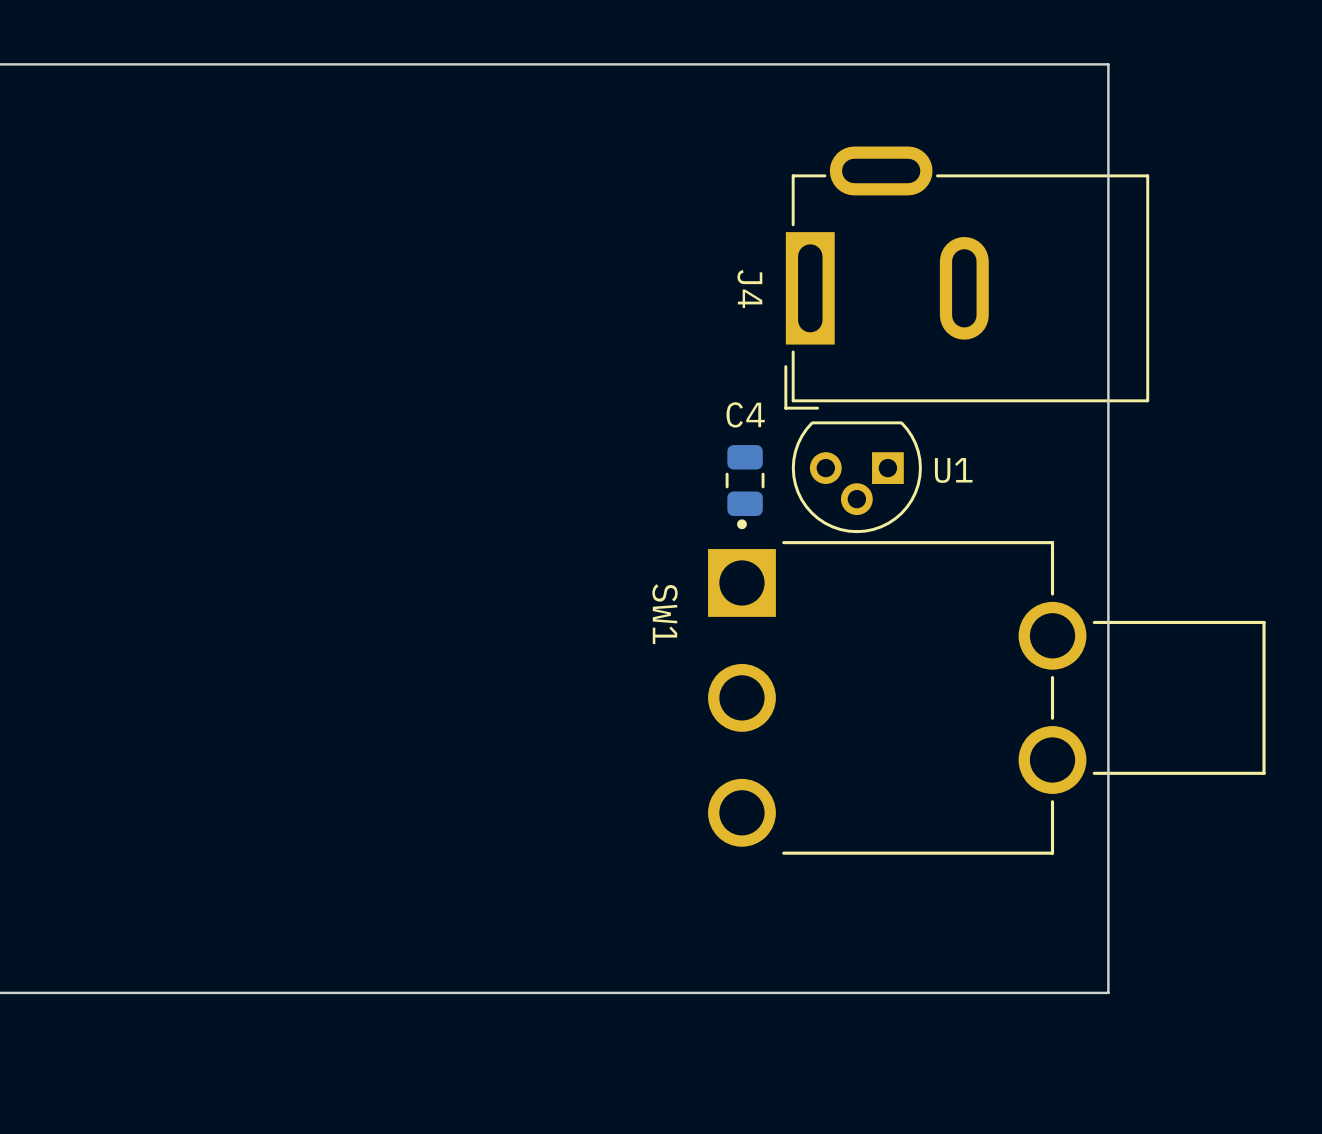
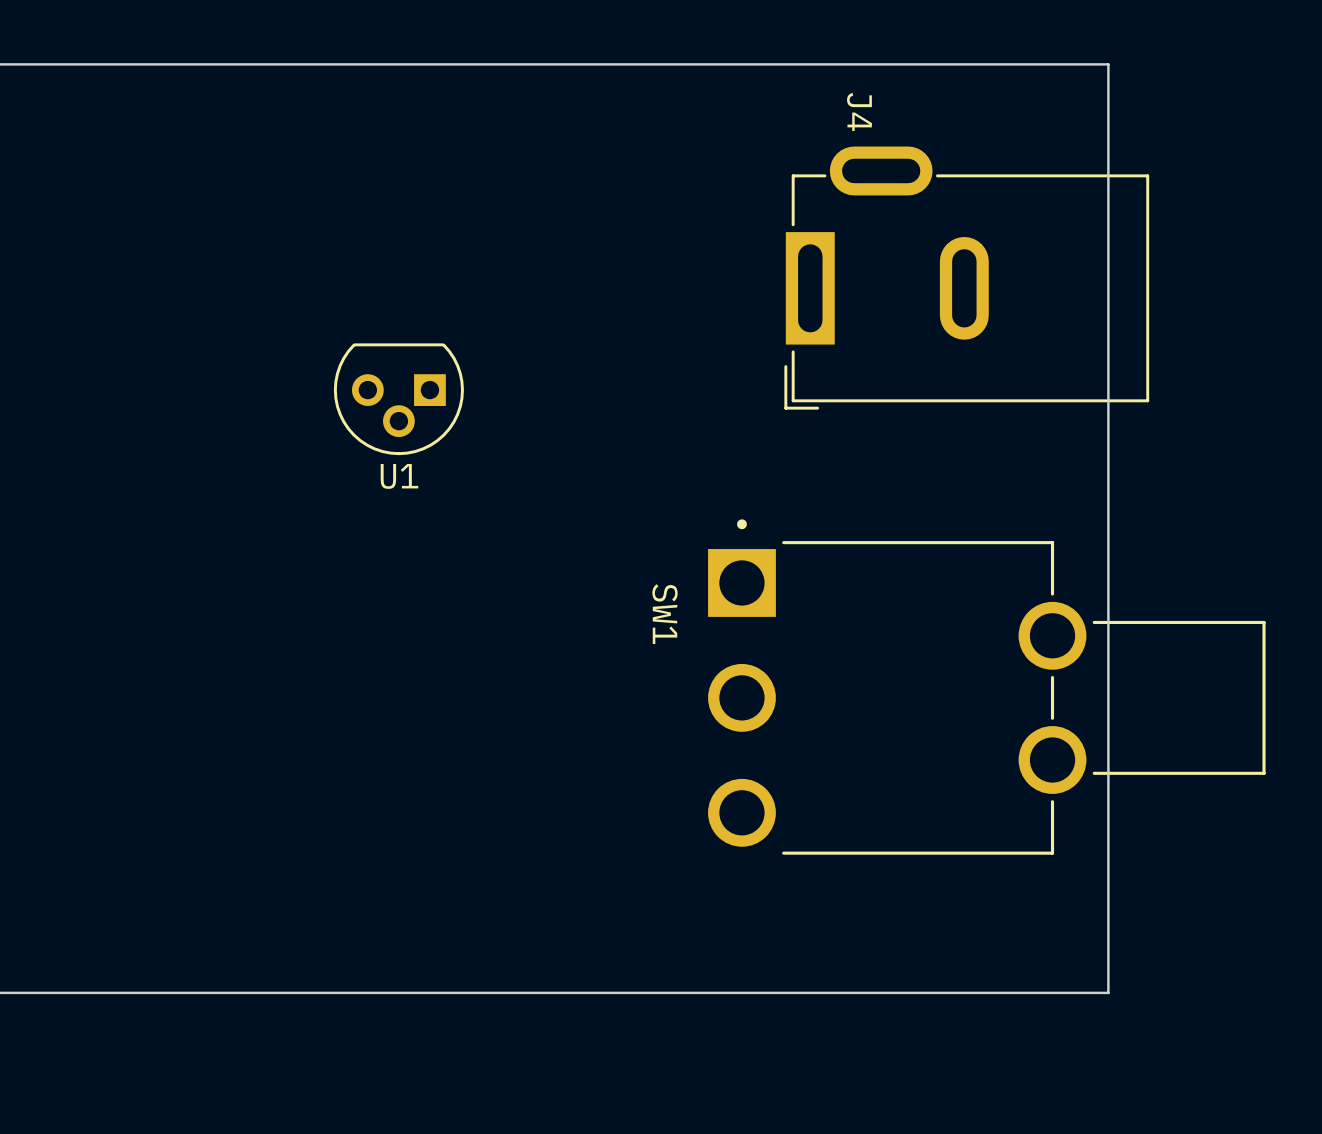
J4 name position: J4 (749, 288) -> J4 (859, 111)
U1 name position: U1 (953, 470) -> U1 (399, 476)
U1 position: (856, 477) -> (398, 399)
C4: (745, 480) -> none

